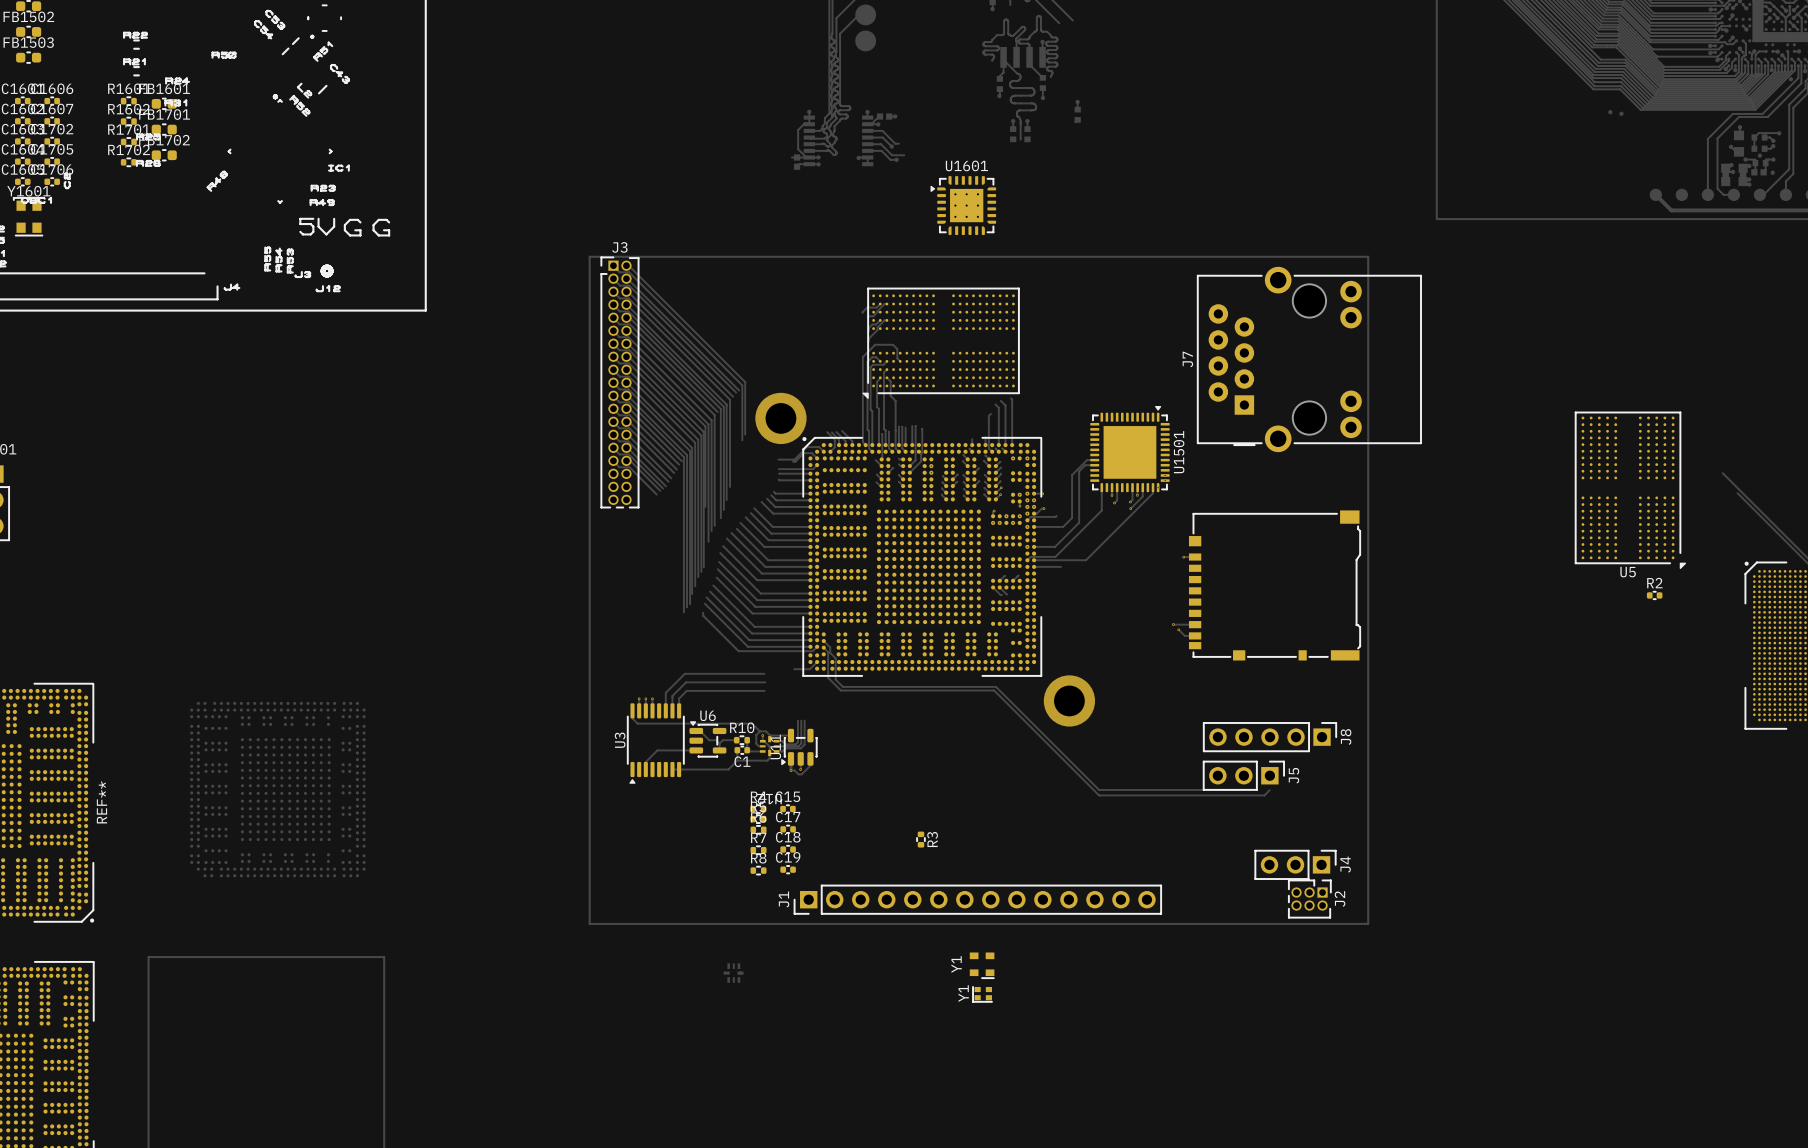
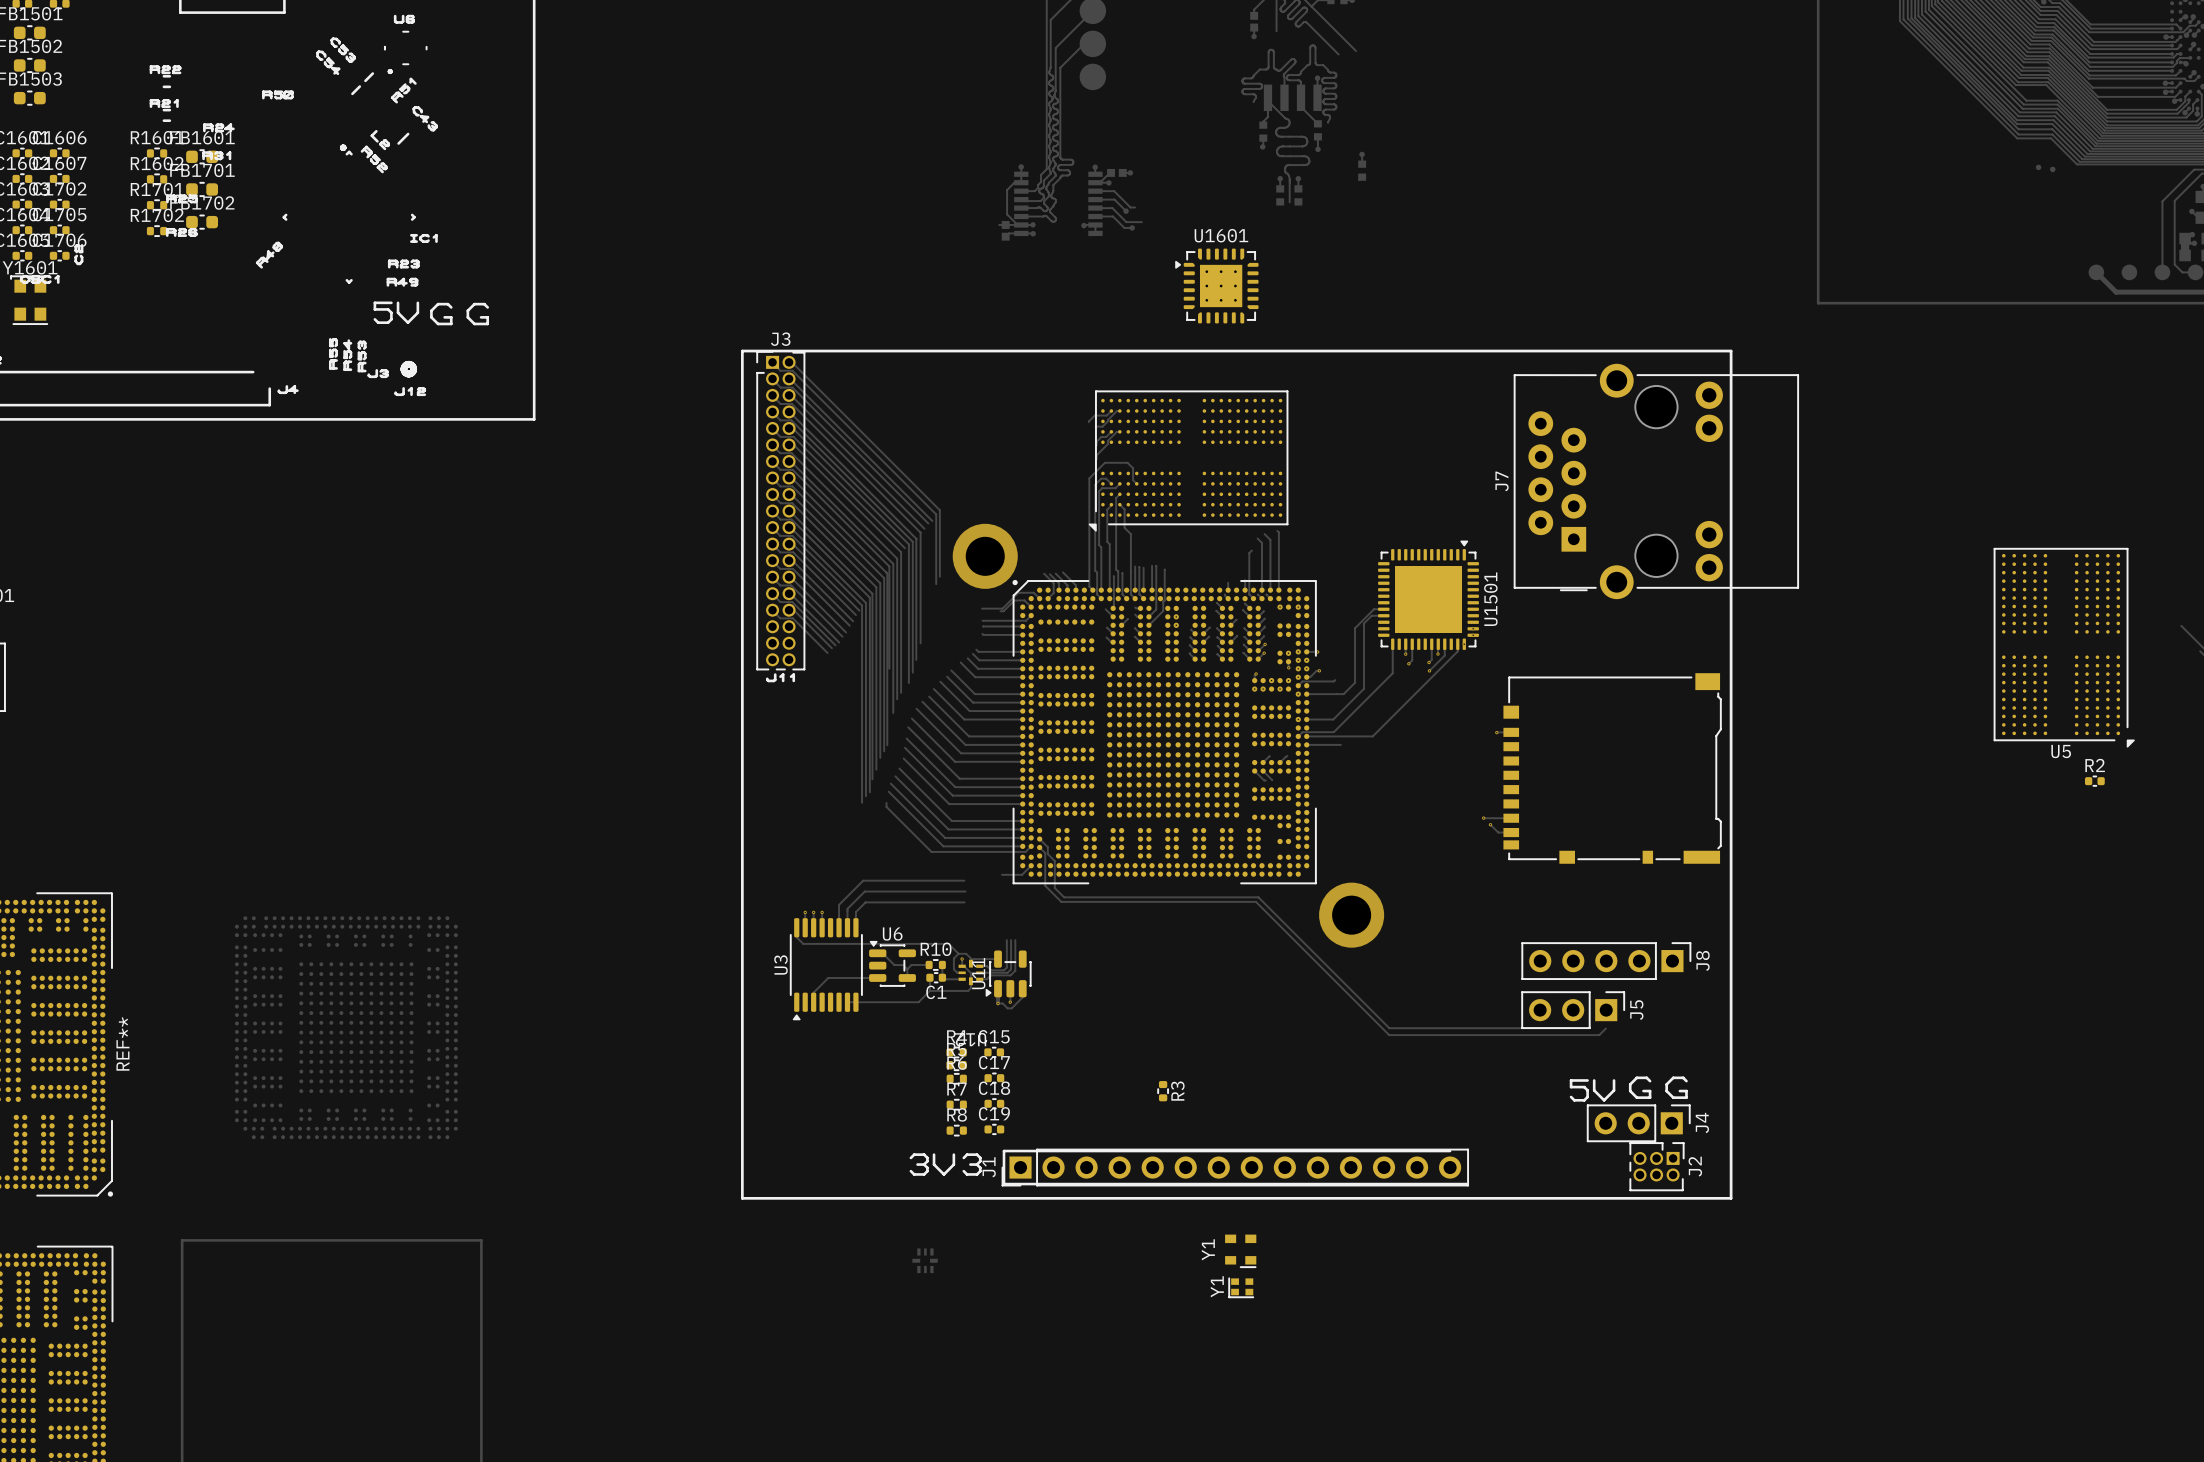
line: none -> (742, 351) (742, 1198) (1731, 1198) (1731, 351) (742, 351)
line: none -> (775, 674) (773, 680) (768, 680) (767, 678)
line: none -> (780, 676) (783, 674) (783, 680)
line: none -> (791, 676) (793, 674) (793, 680)
line: none -> (1587, 1080) (1571, 1080) (1571, 1087) (1584, 1087) (1587, 1090) (1587, 1097) (1584, 1100) (1574, 1100) (1571, 1097)
line: none -> (1594, 1080) (1594, 1090) (1604, 1100) (1614, 1090) (1614, 1080)
line: none -> (1650, 1081) (1646, 1077) (1636, 1077) (1630, 1084) (1630, 1091) (1636, 1097) (1650, 1097) (1650, 1091) (1643, 1091)
line: none -> (1686, 1081) (1683, 1077) (1673, 1077) (1666, 1084) (1666, 1091) (1673, 1097) (1686, 1097) (1686, 1091) (1679, 1091)
line: none -> (1450, 1151) (1003, 1151) (1003, 1184) (1466, 1184)
line: none -> (934, 1154) (934, 1164) (943, 1174) (953, 1164) (953, 1154)
line: none -> (910, 1157) (914, 1154) (924, 1154) (927, 1157) (924, 1164)
line: none -> (963, 1157) (967, 1154) (976, 1154) (980, 1157) (976, 1164)
line: none -> (917, 1164) (924, 1164)
line: none -> (924, 1164) (927, 1167) (924, 1174) (914, 1174) (910, 1171)
line: none -> (970, 1164) (976, 1164)
line: none -> (976, 1164) (980, 1167) (976, 1174) (967, 1174) (963, 1171)

